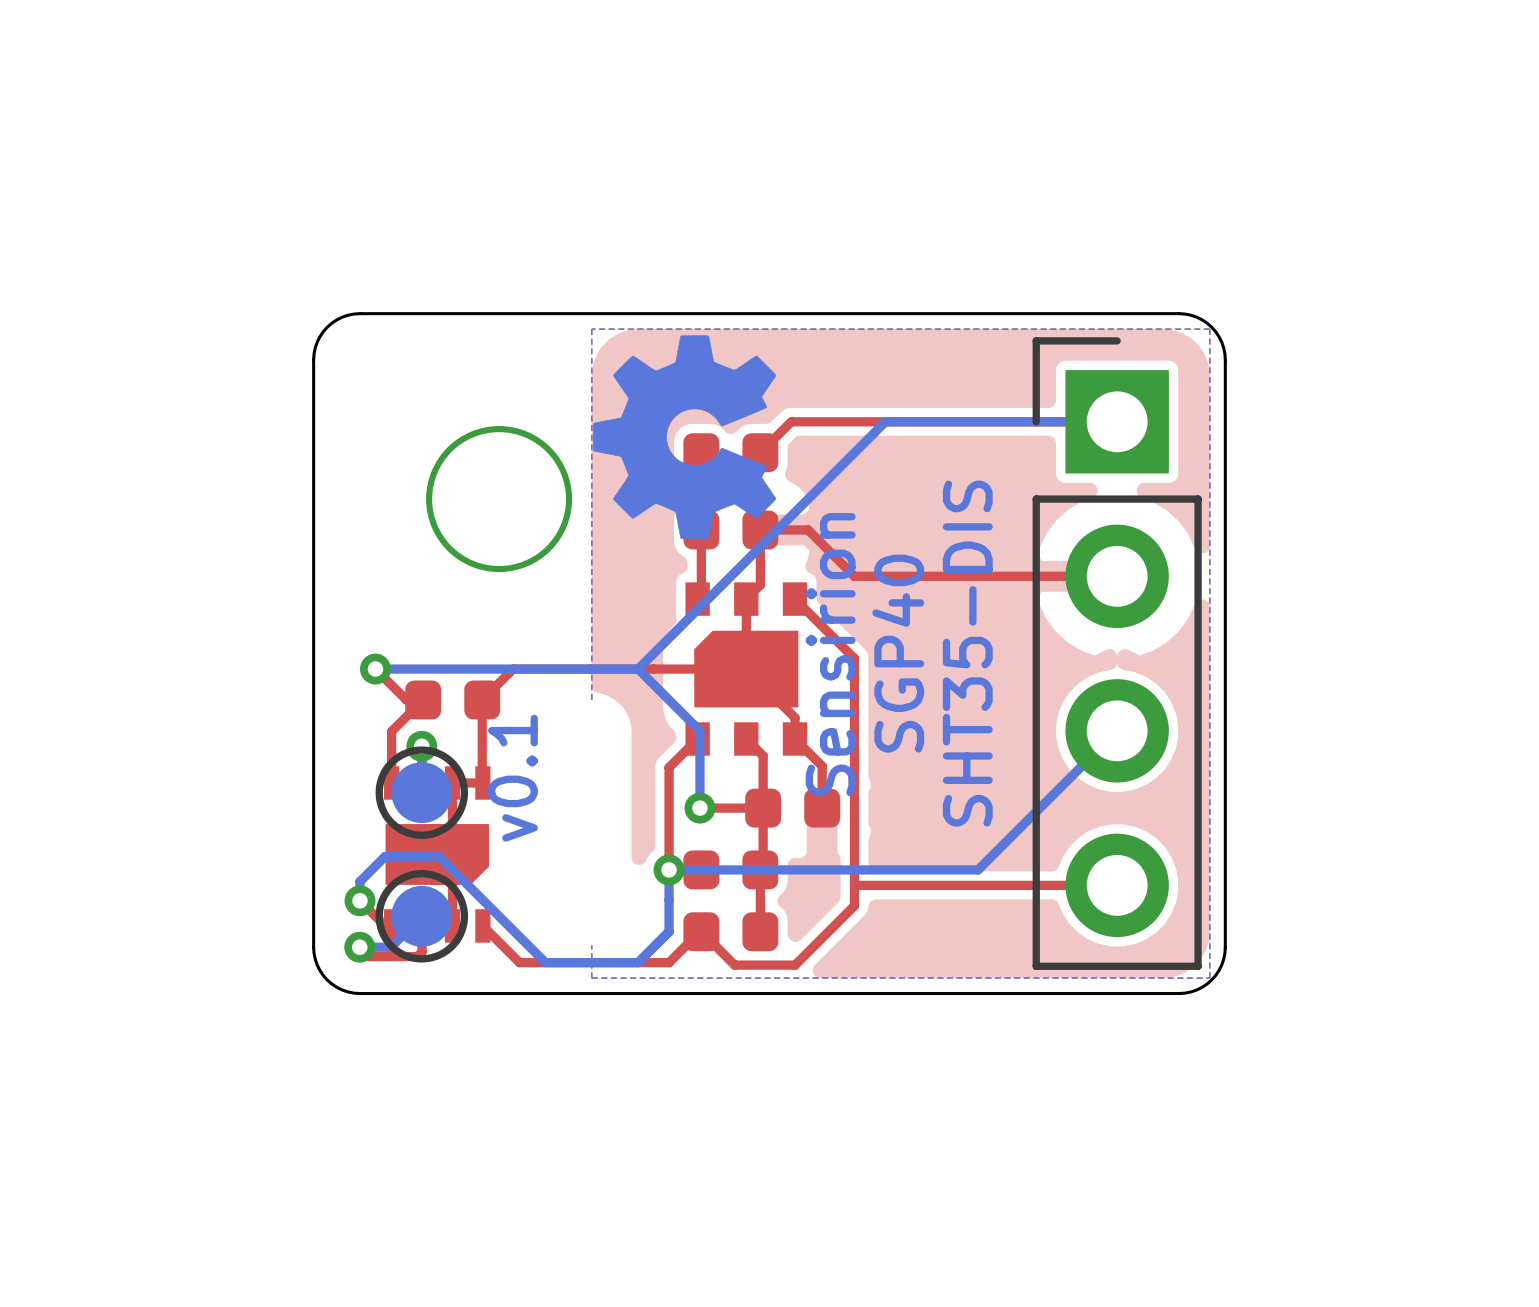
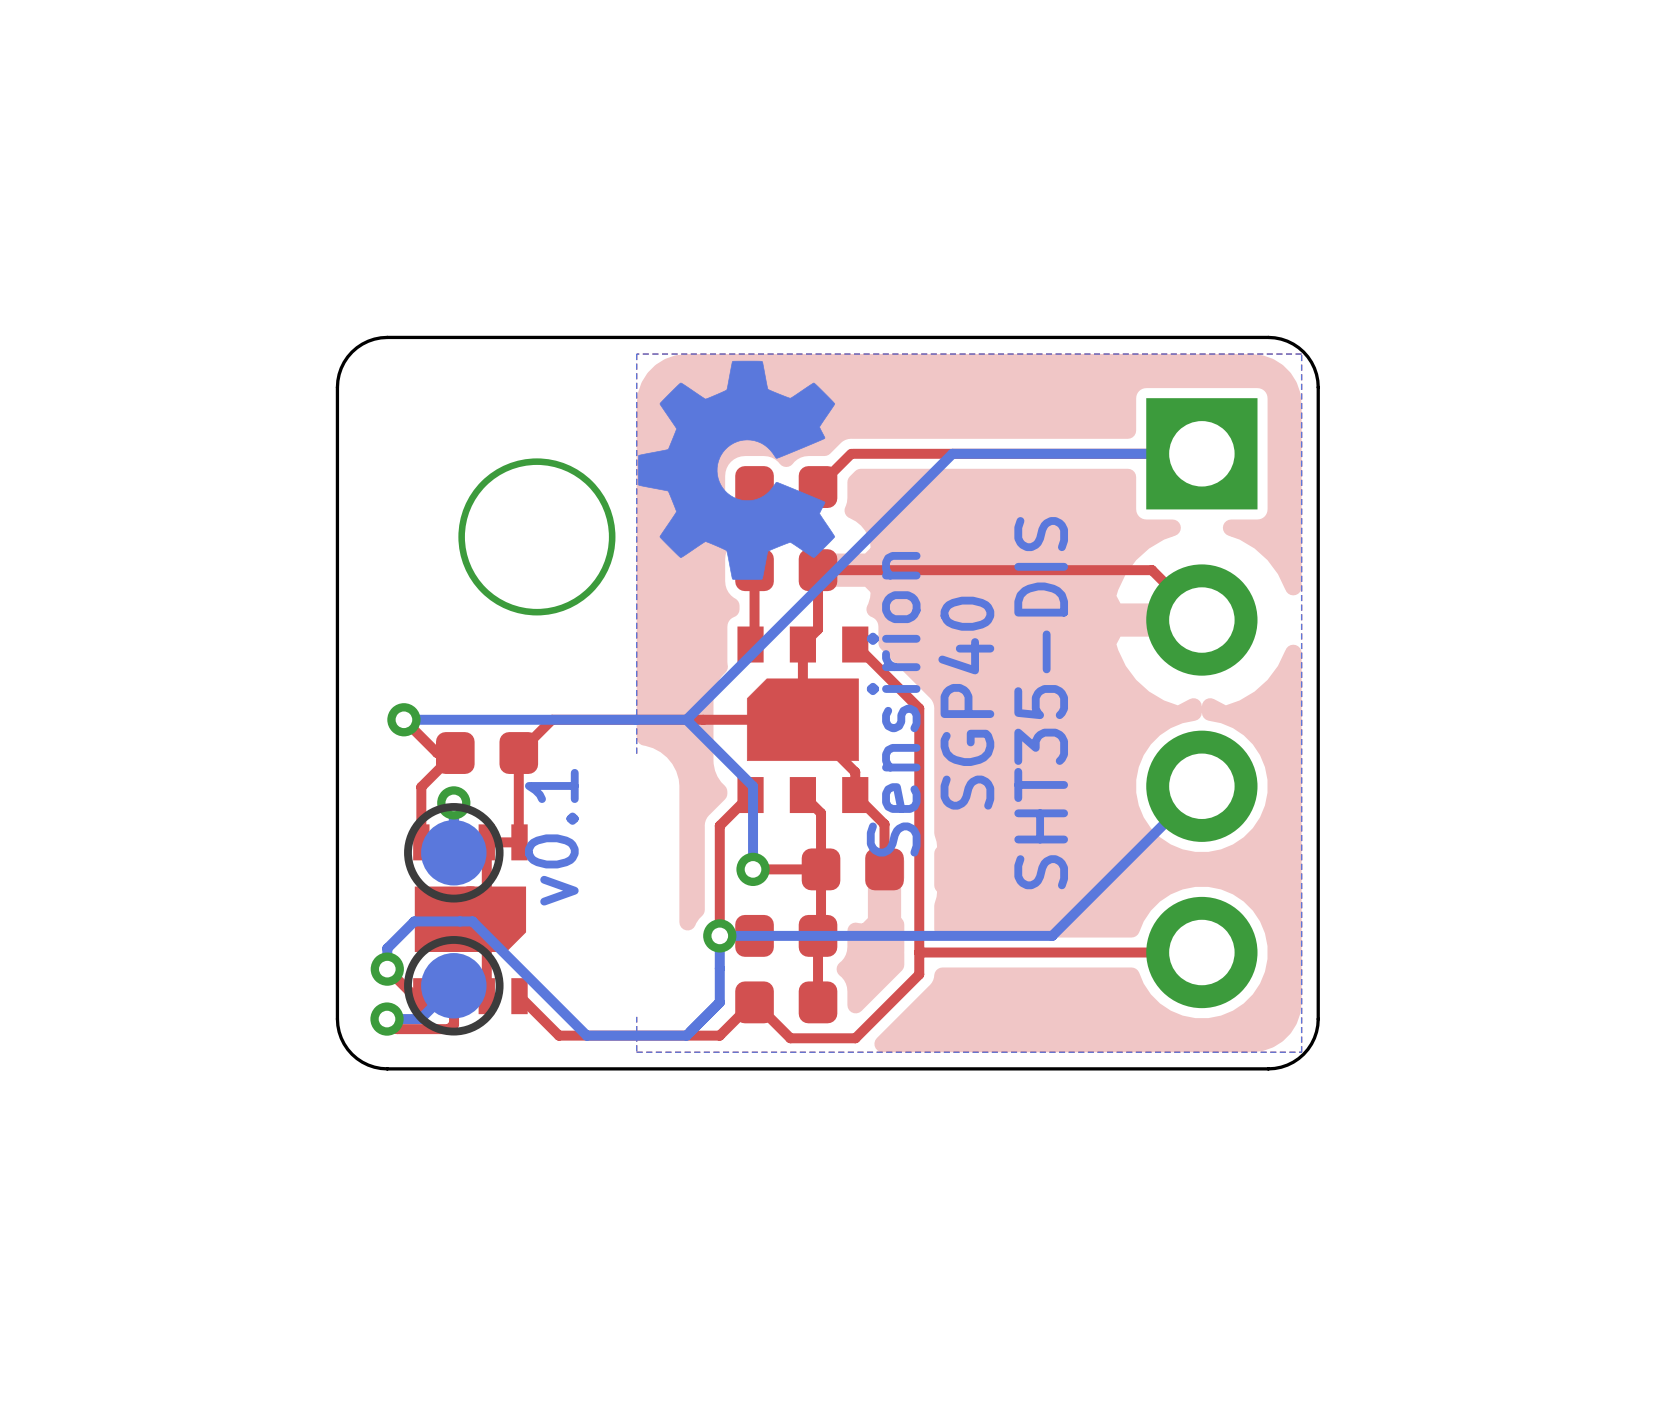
top track: (808, 529) (854, 576) (1117, 576) -> (869, 570) (1152, 570) (1201, 620)
part side: bottom (1117, 653) -> top (1201, 703)

